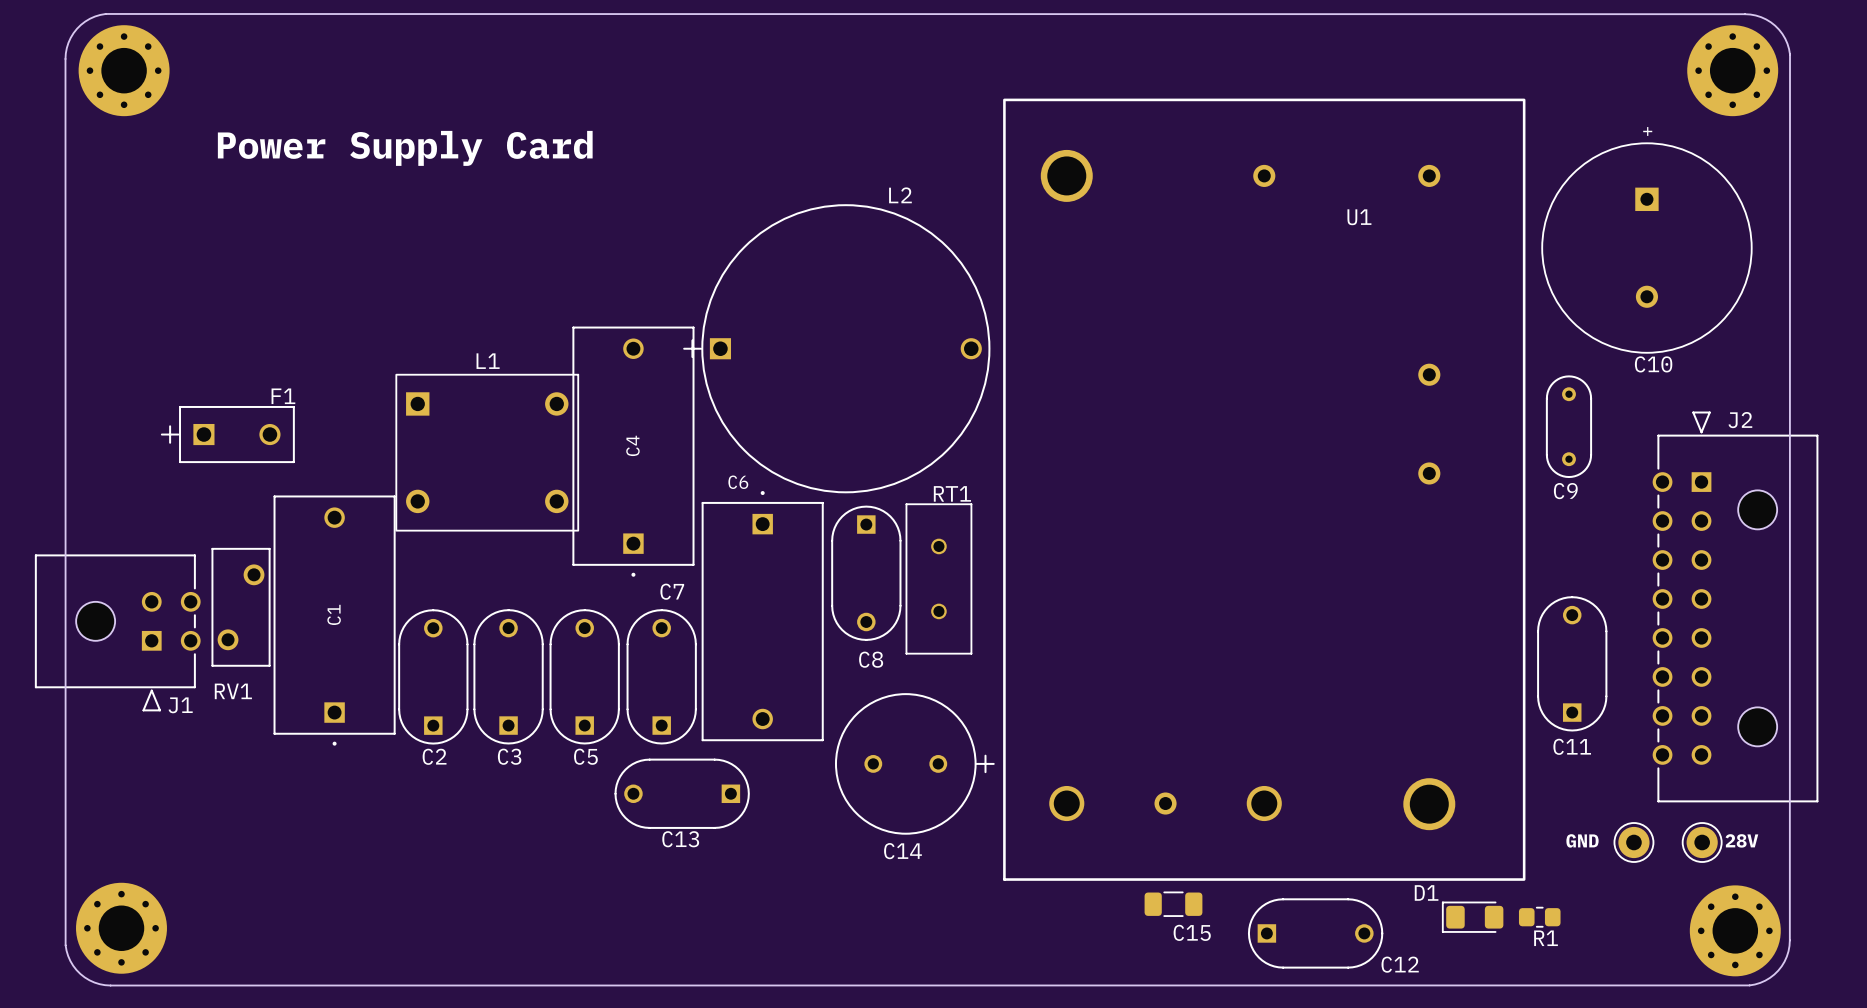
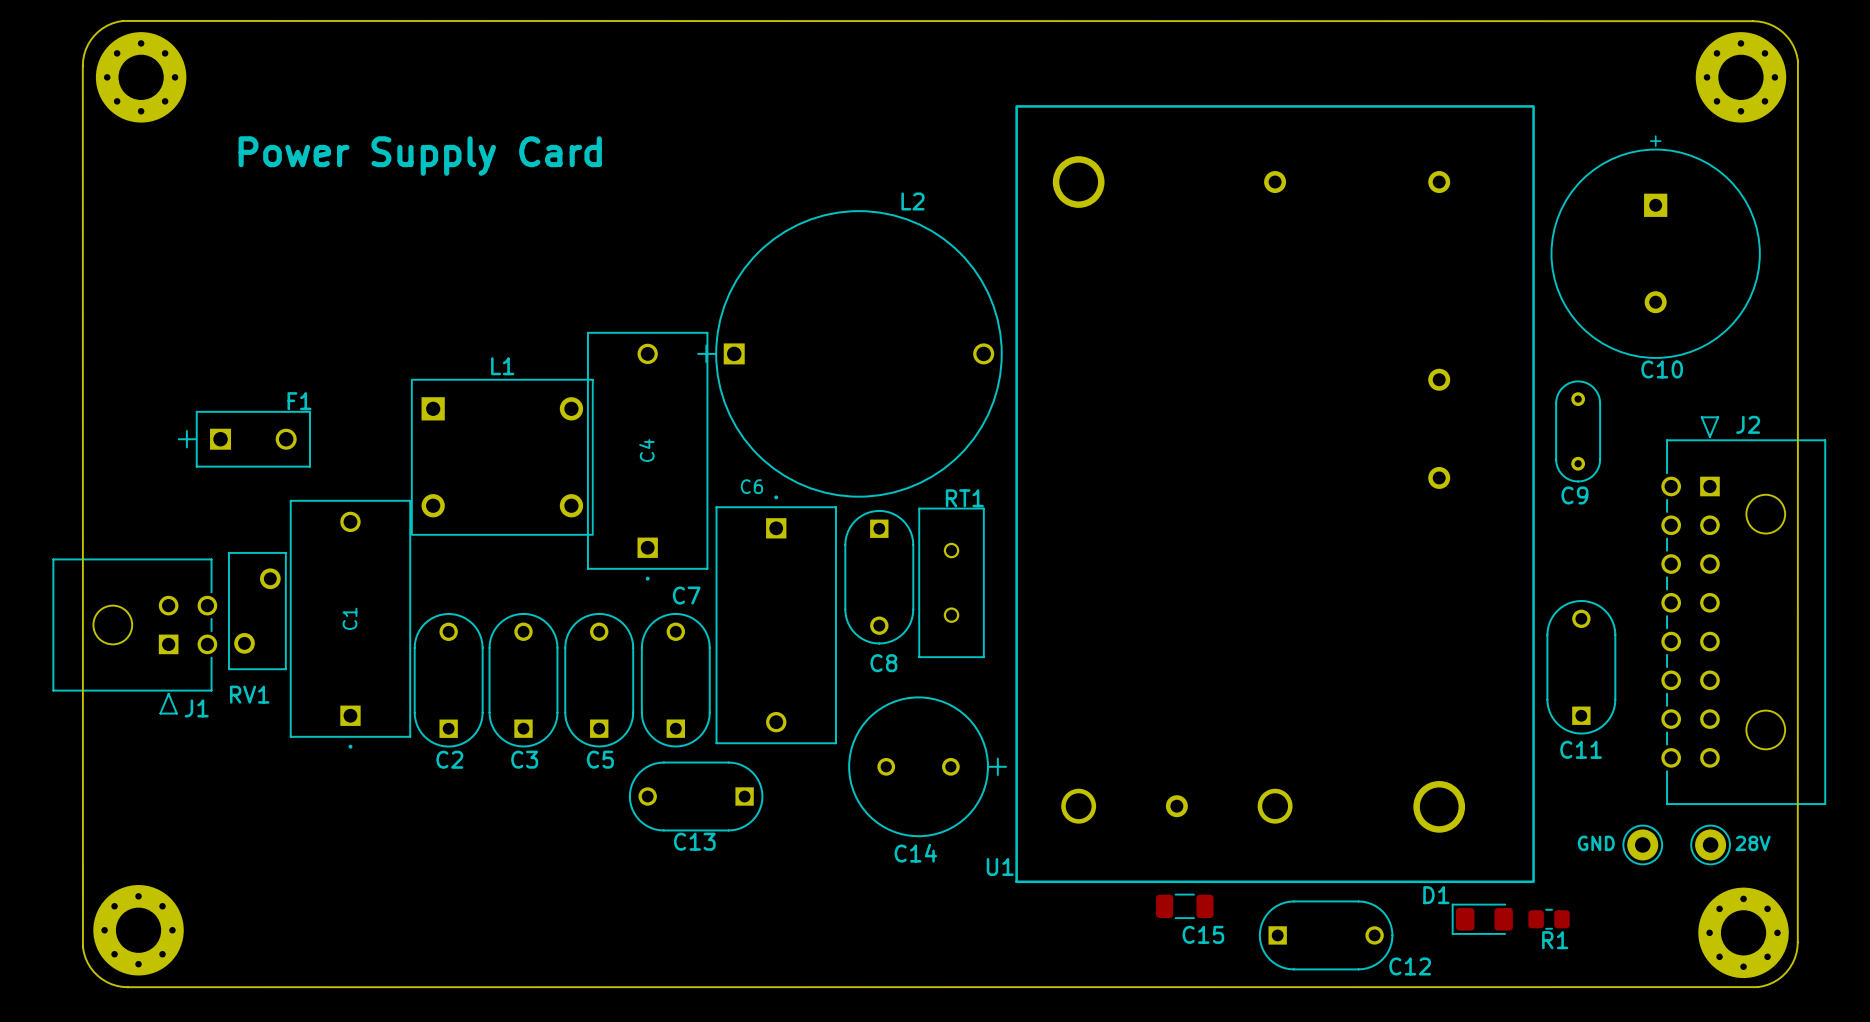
U1 name position: U1 (1359, 217) -> U1 (1000, 867)

